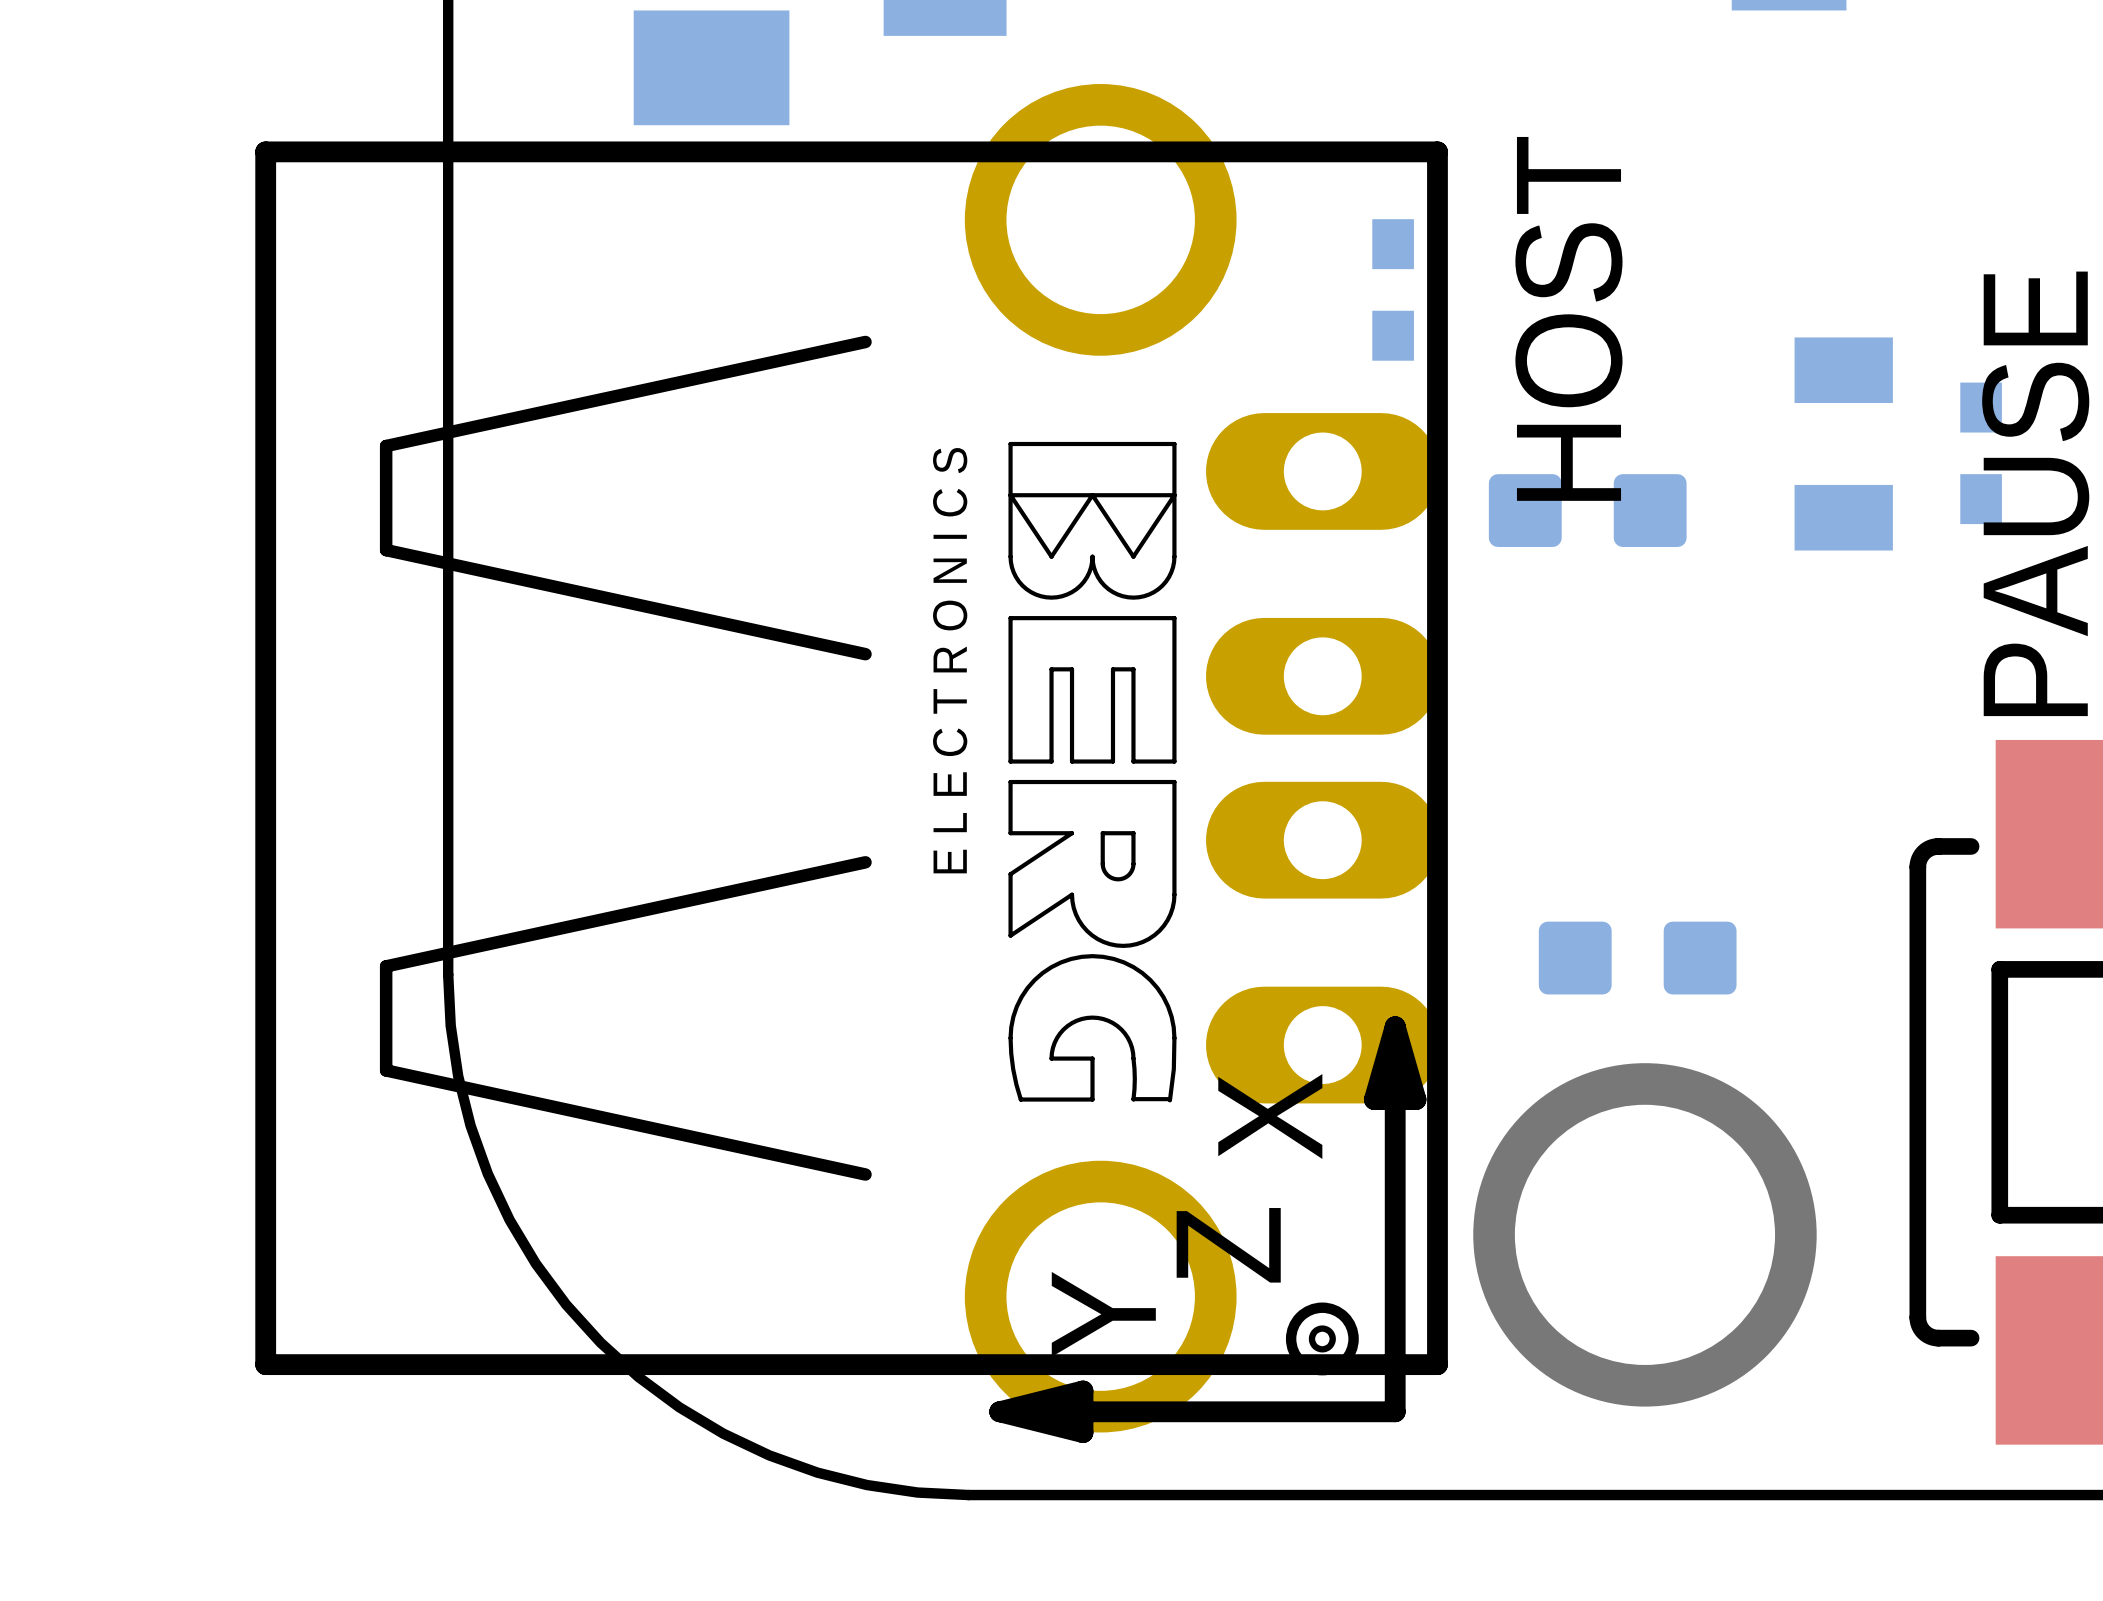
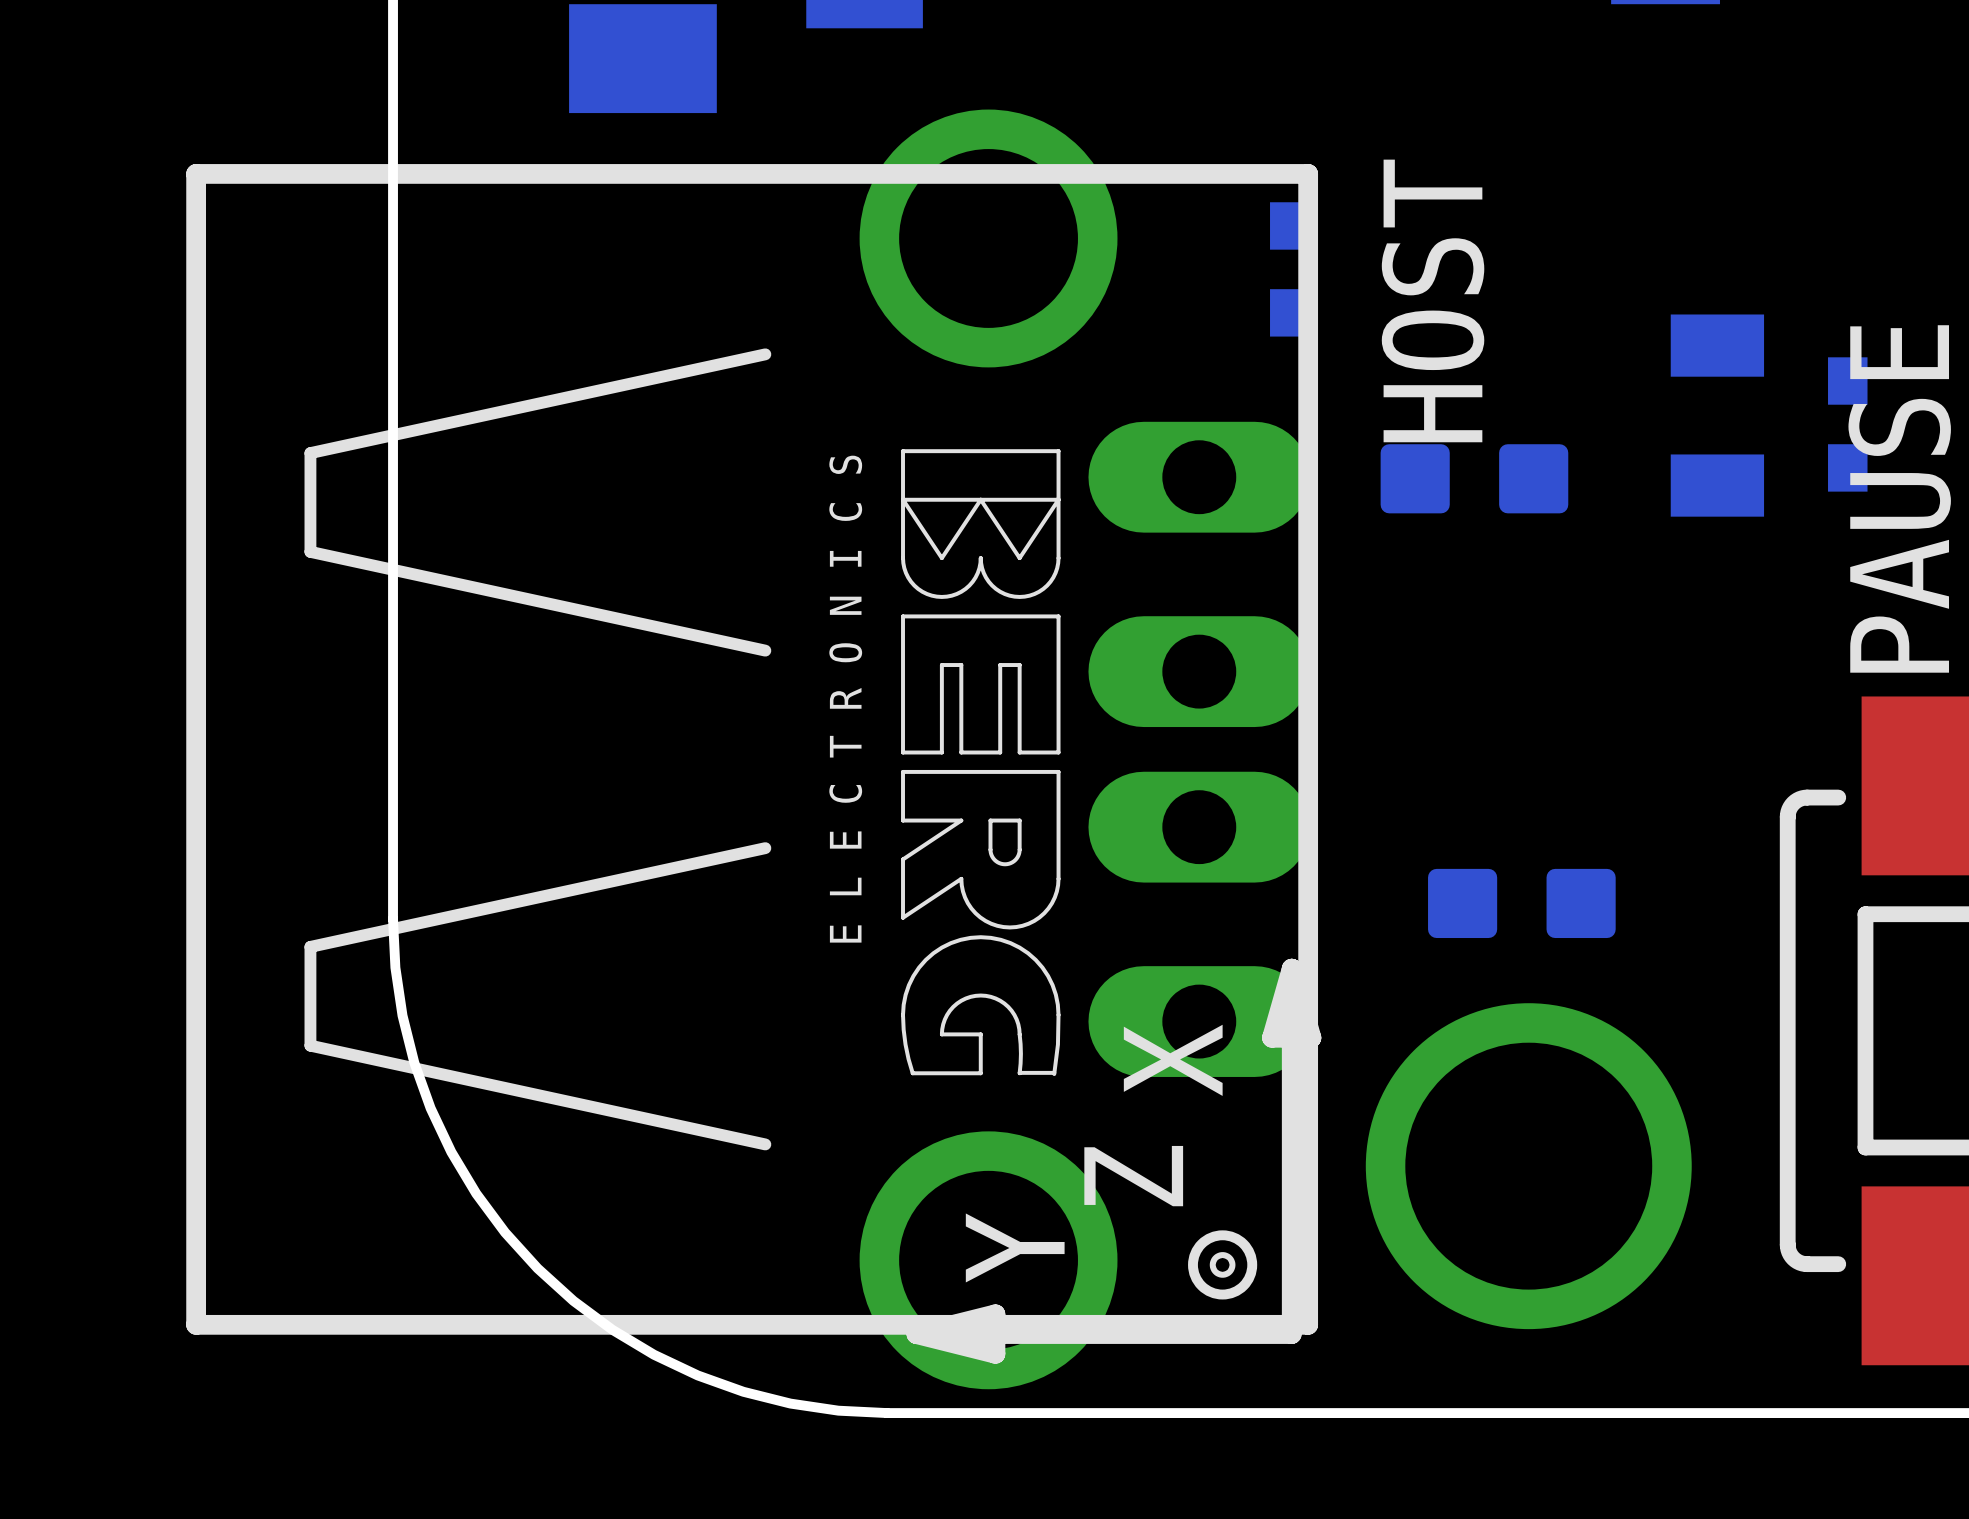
HOST position: (851, 758) -> (752, 749)

